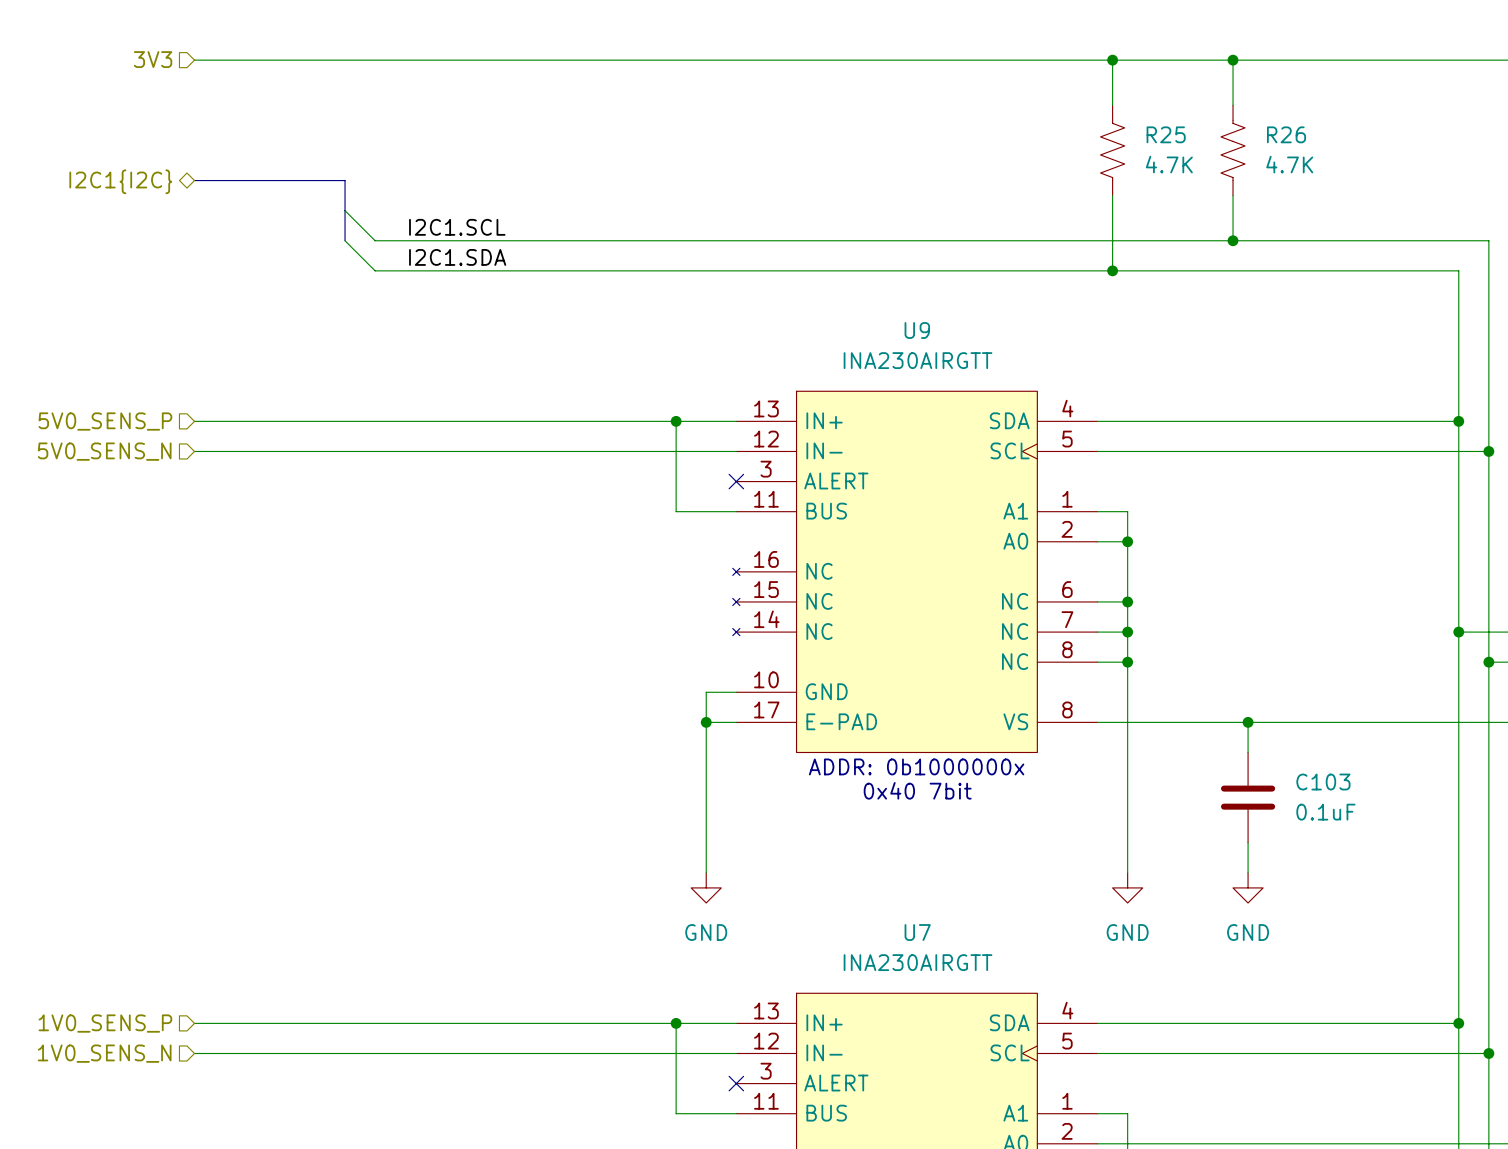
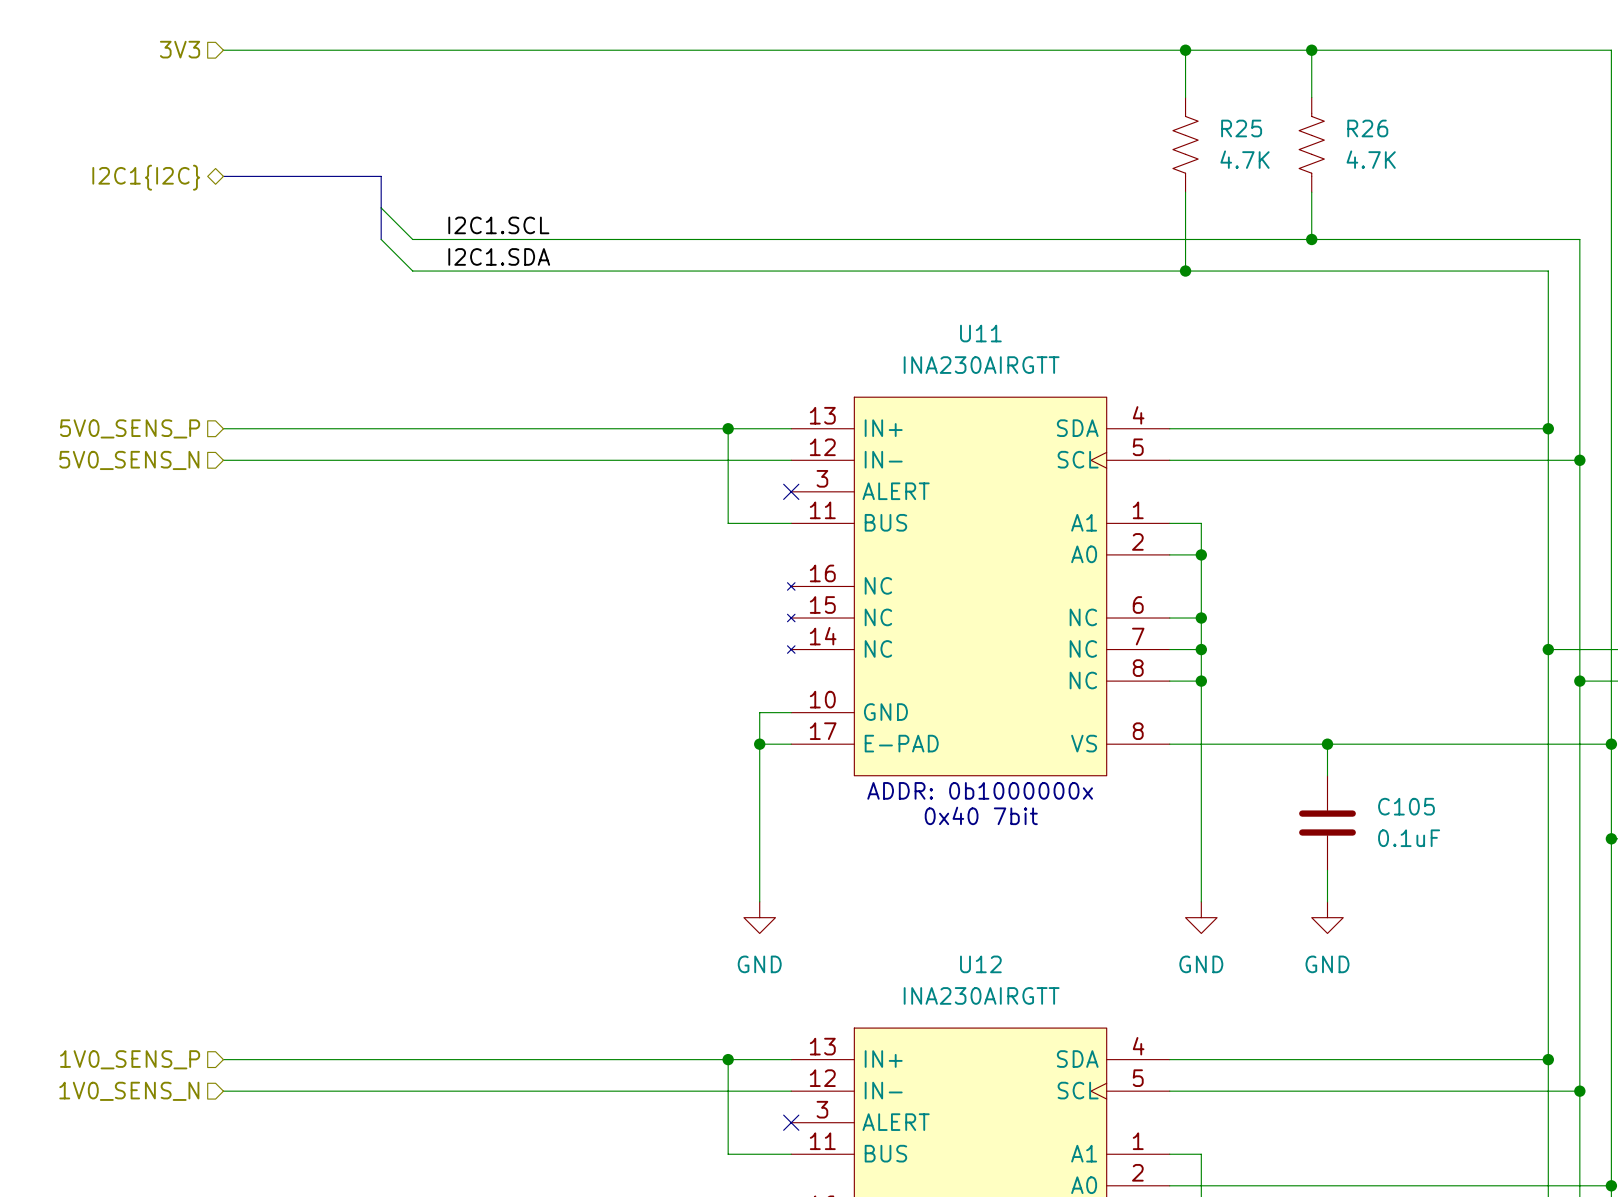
U9 name: U9 (917, 330) -> U11 (980, 333)
C103 name: C103 (1323, 782) -> C105 (1406, 806)
U7 name: U7 (917, 932) -> U12 (980, 964)

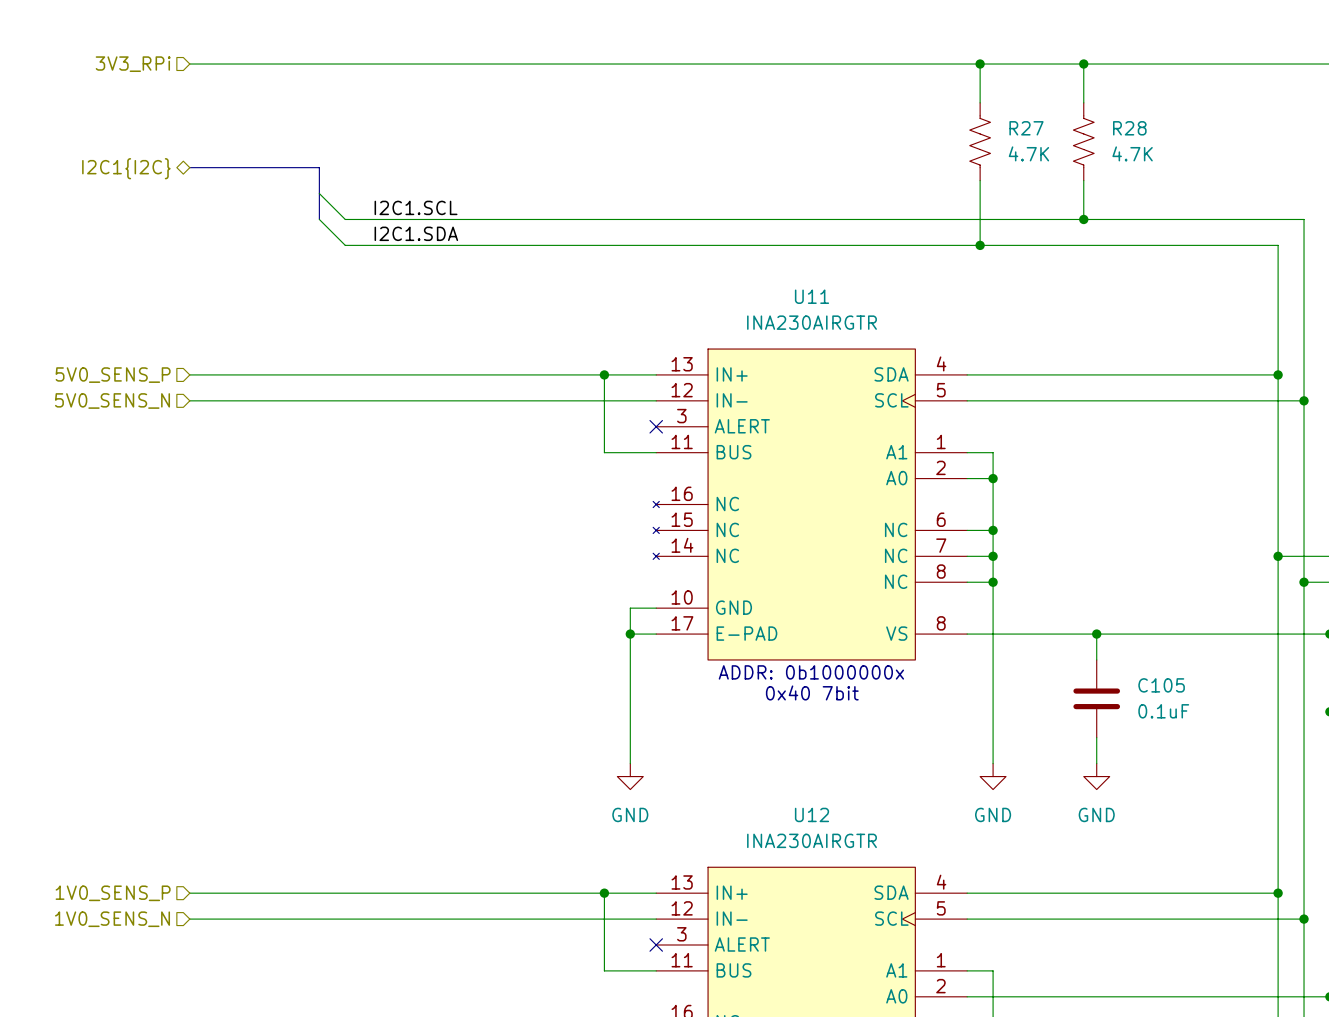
hierarchical label: 3V3 (180, 49) -> 3V3_RPi (133, 64)
R25 name: R25 (1241, 128) -> R27 (1026, 128)
R26 name: R26 (1367, 128) -> R28 (1129, 128)
U11 value: INA230AIRGTT (981, 365) -> INA230AIRGTR (812, 322)
U12 value: INA230AIRGTT (981, 995) -> INA230AIRGTR (812, 840)

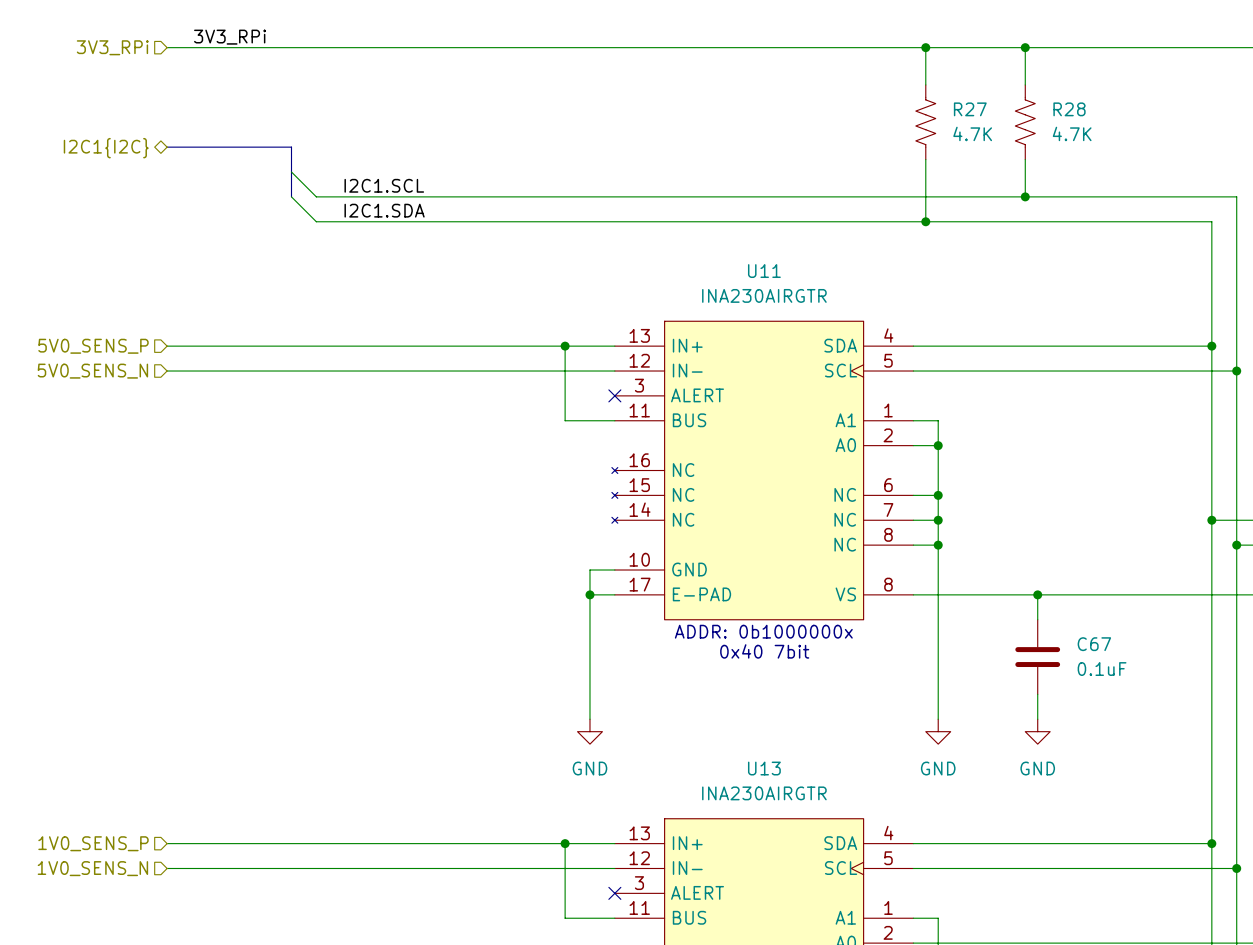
label: none -> 3V3_RPi (230, 37)
C105 name: C105 (1161, 685) -> C67 (1094, 644)
U12 name: U12 (812, 814) -> U13 (764, 768)

